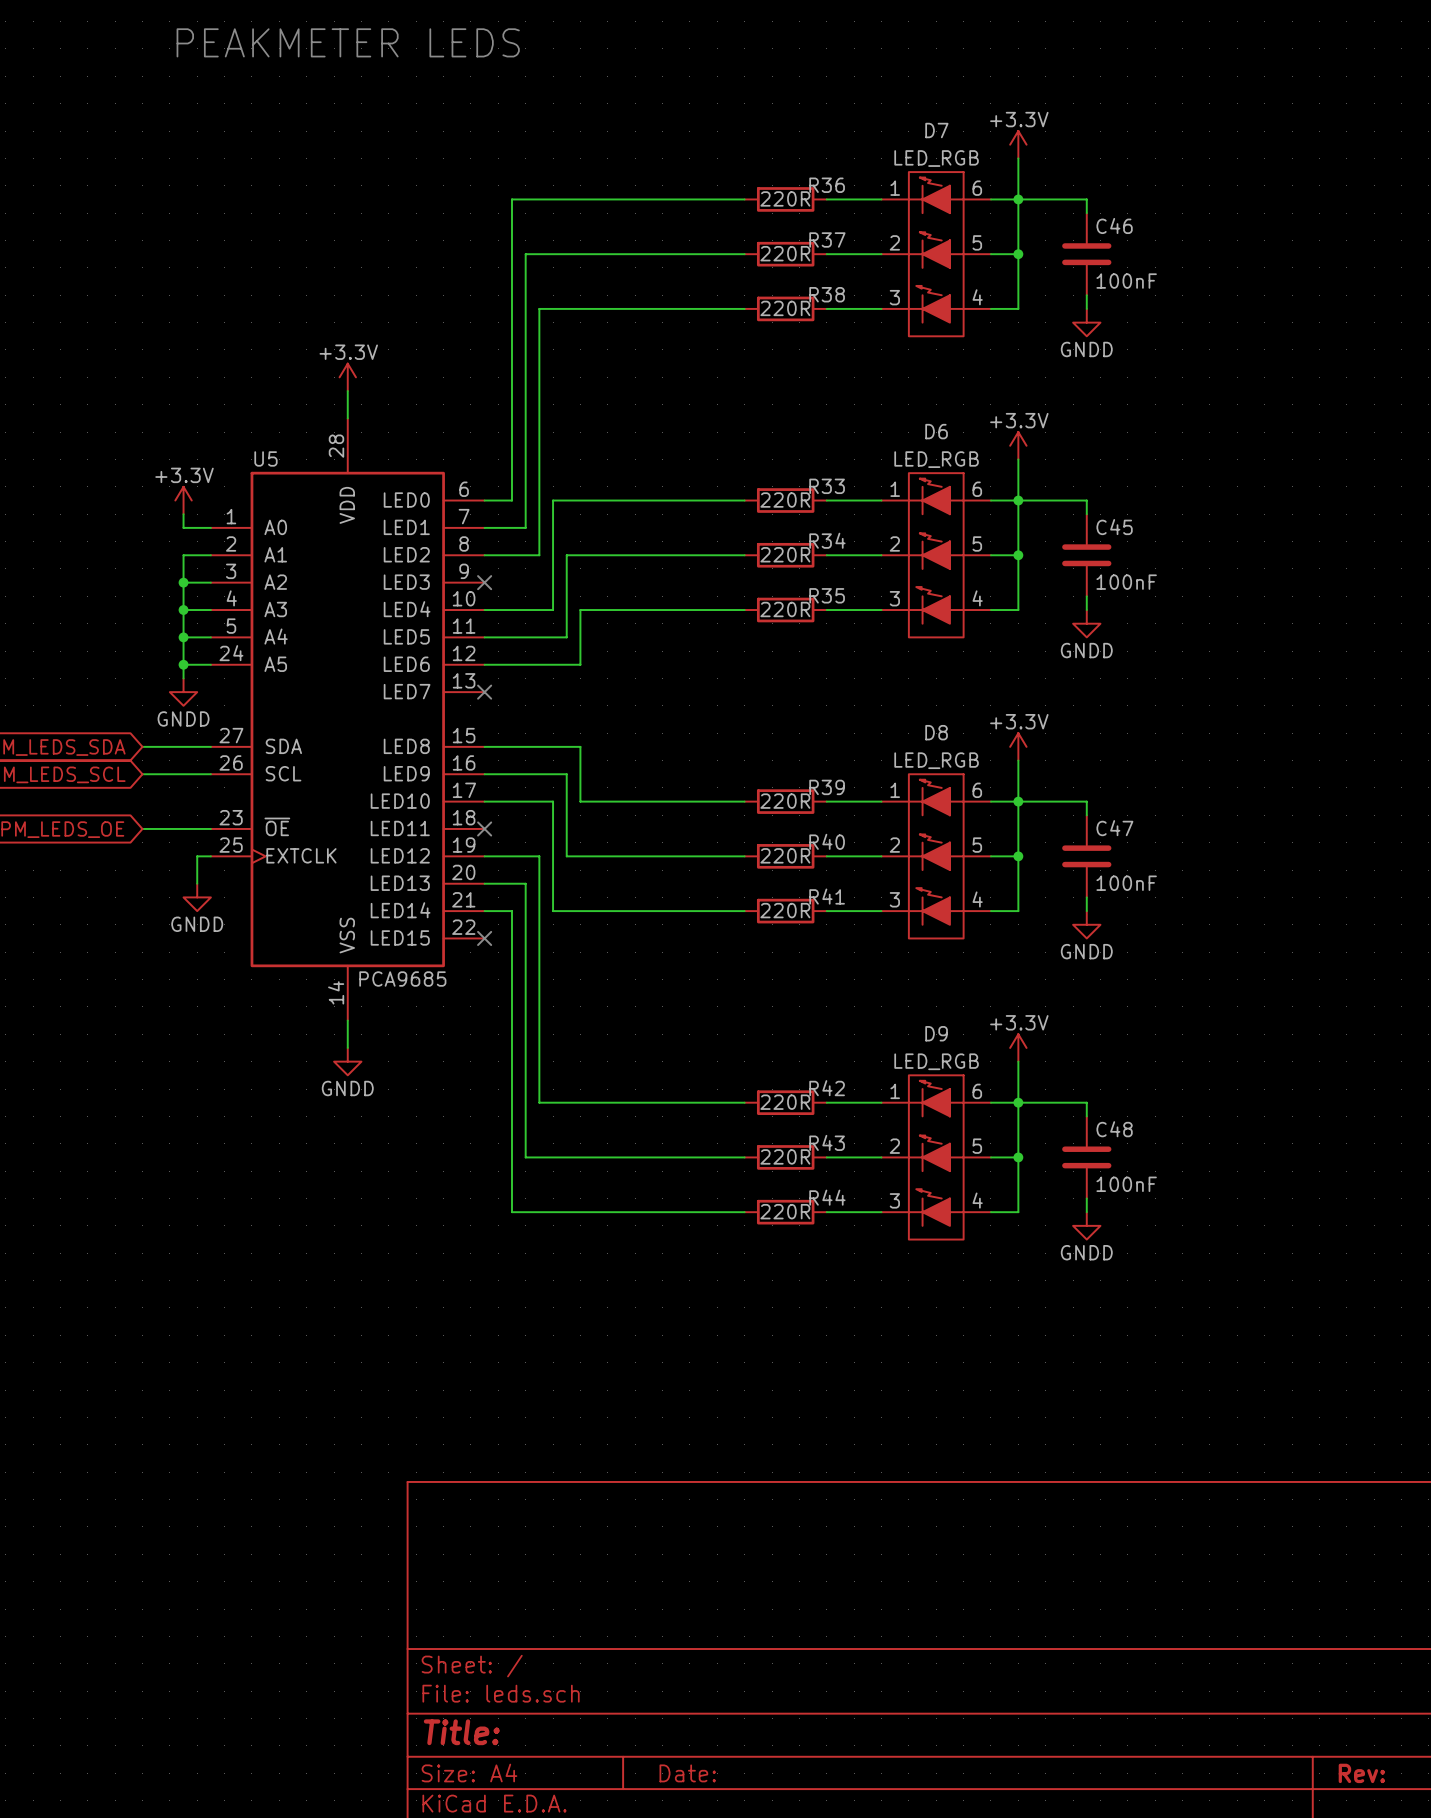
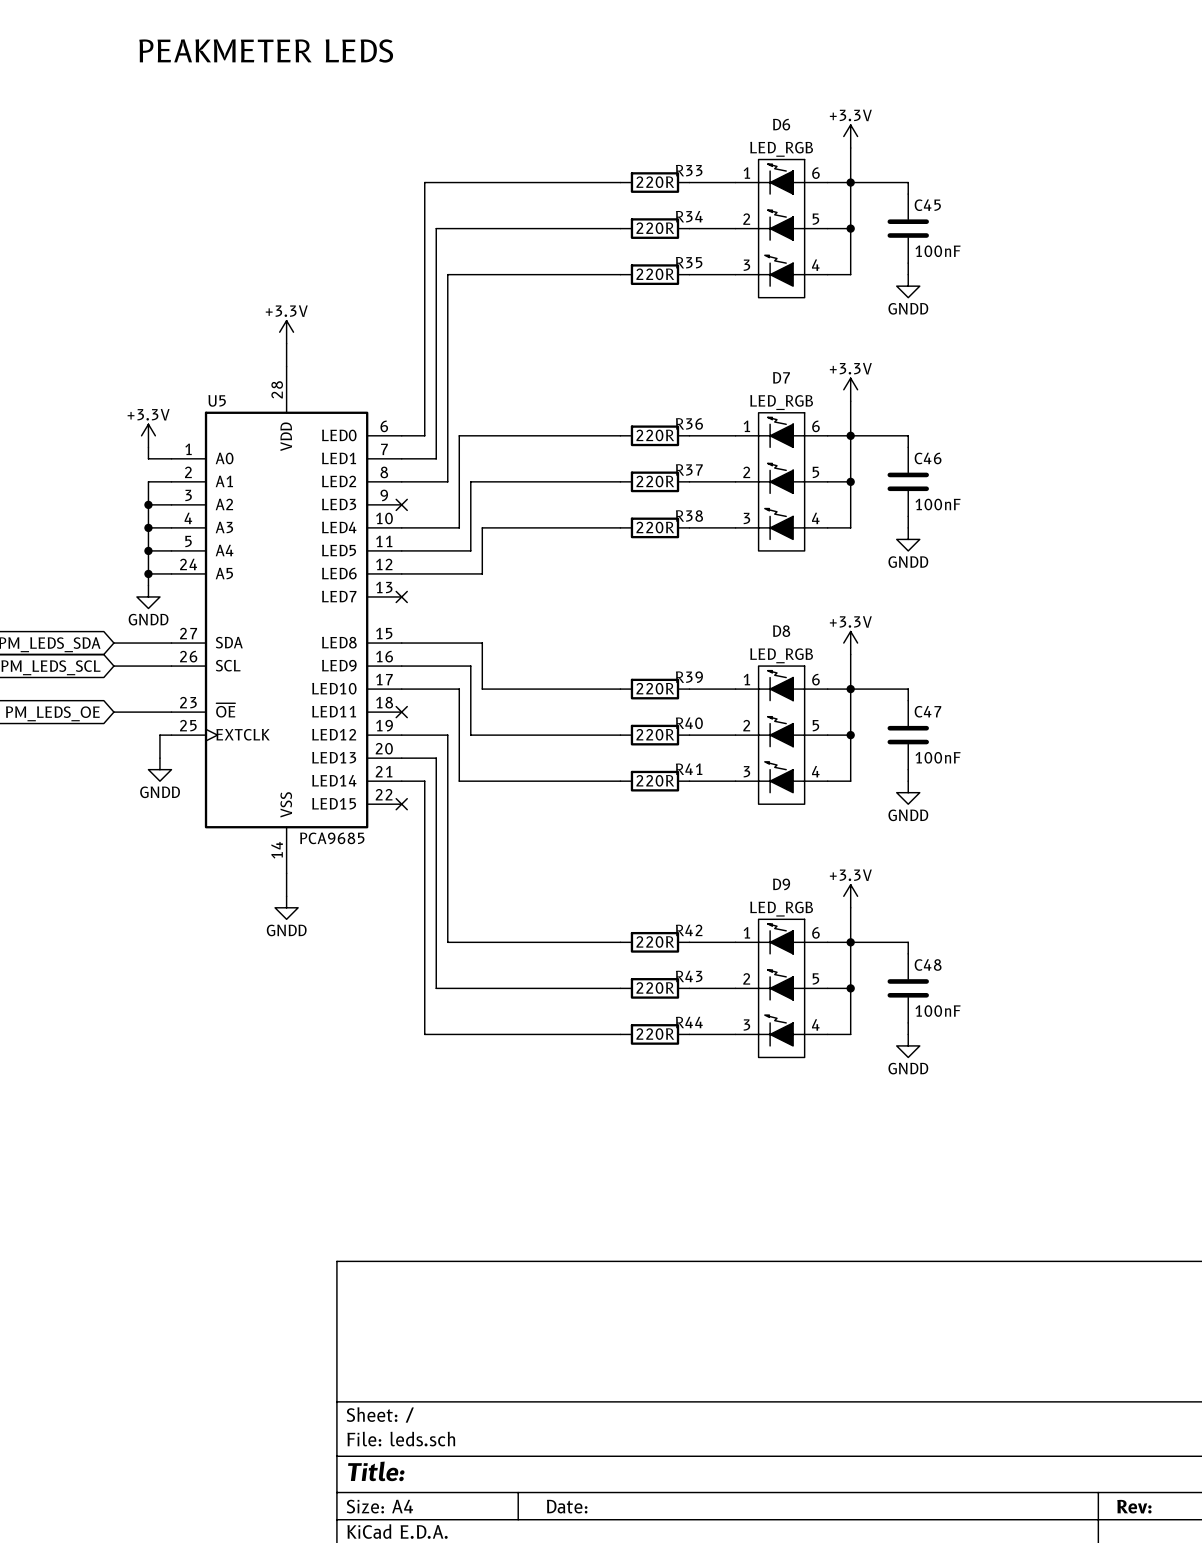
D7 name: D7 (936, 130) -> D6 (781, 124)
R36 name: R36 (827, 185) -> R33 (689, 170)
C46 name: C46 (1114, 225) -> C45 (927, 205)
R37 name: R37 (827, 239) -> R34 (689, 216)
R38 name: R38 (827, 294) -> R35 (689, 262)
D6 name: D6 (936, 431) -> D7 (781, 377)
R33 name: R33 (827, 486) -> R36 (689, 423)
C45 name: C45 (1114, 527) -> C46 (928, 458)
R34 name: R34 (827, 540) -> R37 (689, 469)
R35 name: R35 (827, 595) -> R38 (689, 516)

